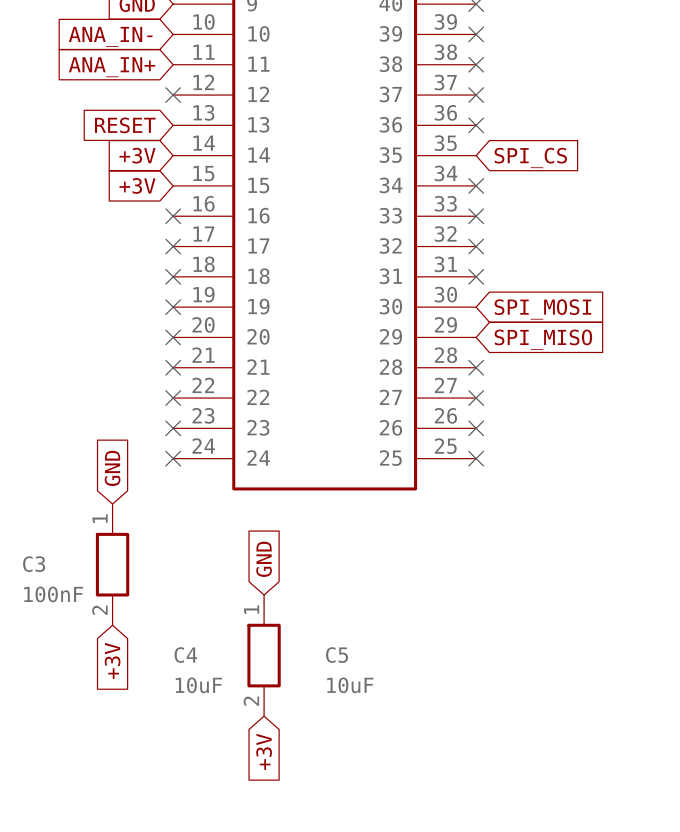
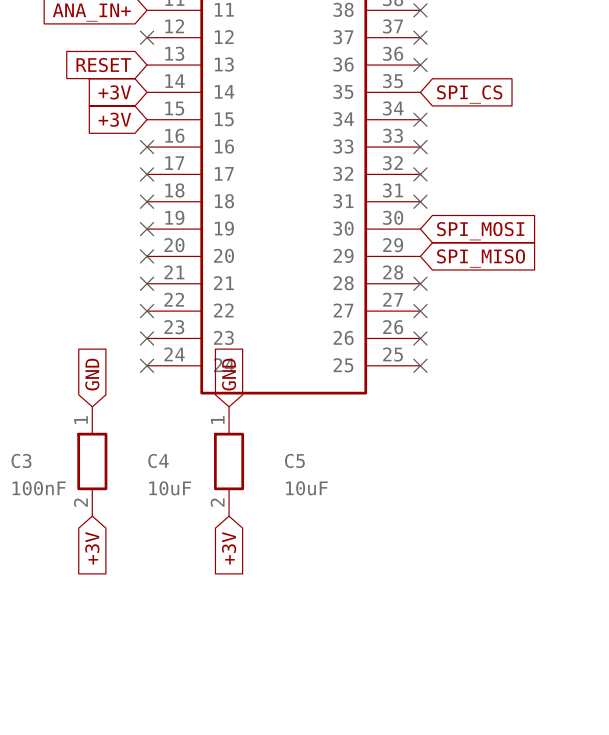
global label position: GND (264, 559) -> GND (229, 374)
C4 name position: C4 (185, 655) -> C4 (158, 460)
C5 position: (264, 655) -> (229, 461)
C4 value position: 10uF (198, 685) -> 10uF (170, 488)
global label position: +3V (264, 751) -> +3V (229, 548)

